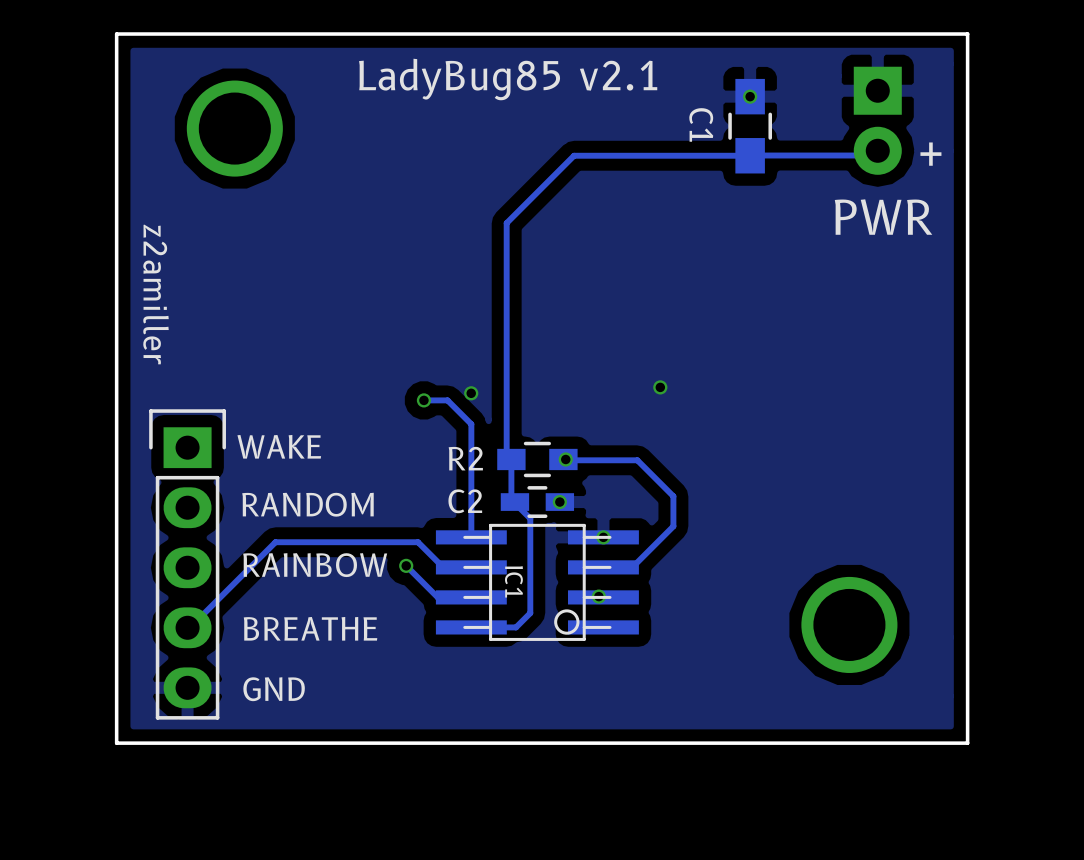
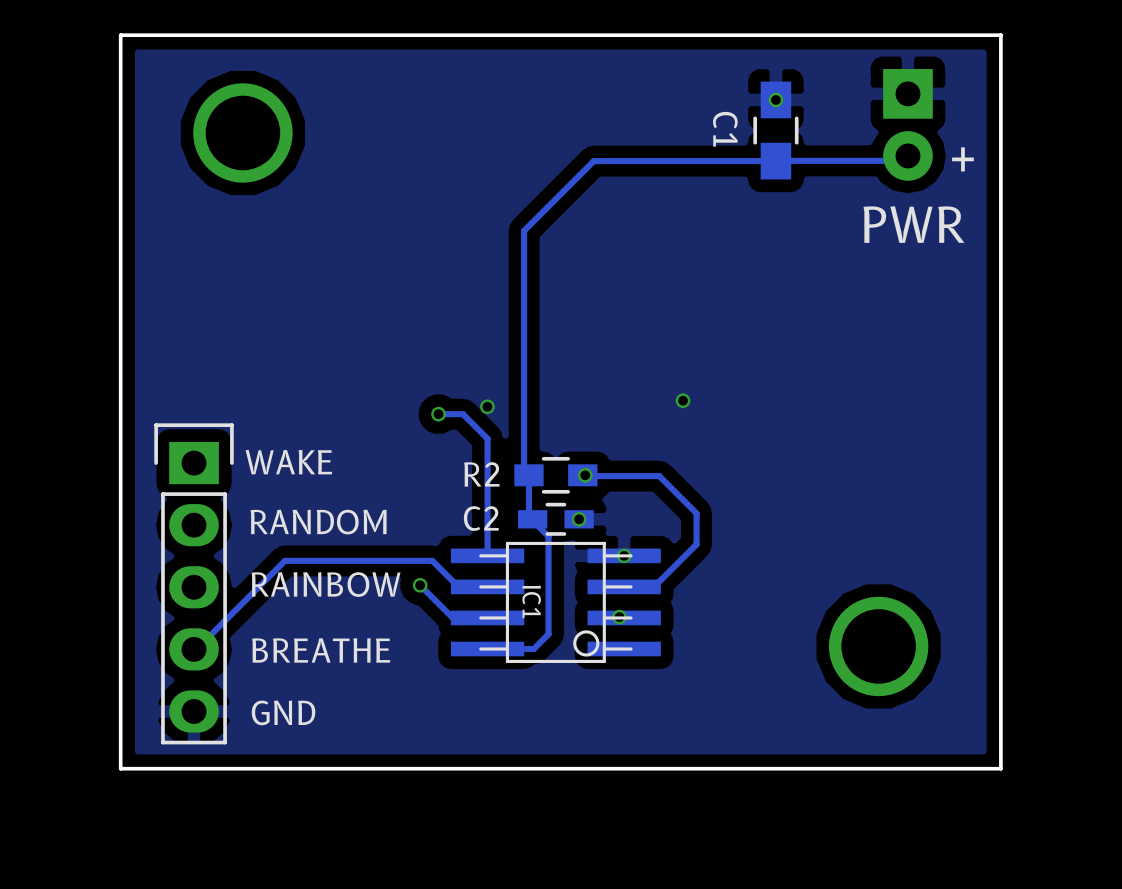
text: LadyBug85 v2.1 (508, 79) -> none
text: z2amiller (156, 294) -> none

